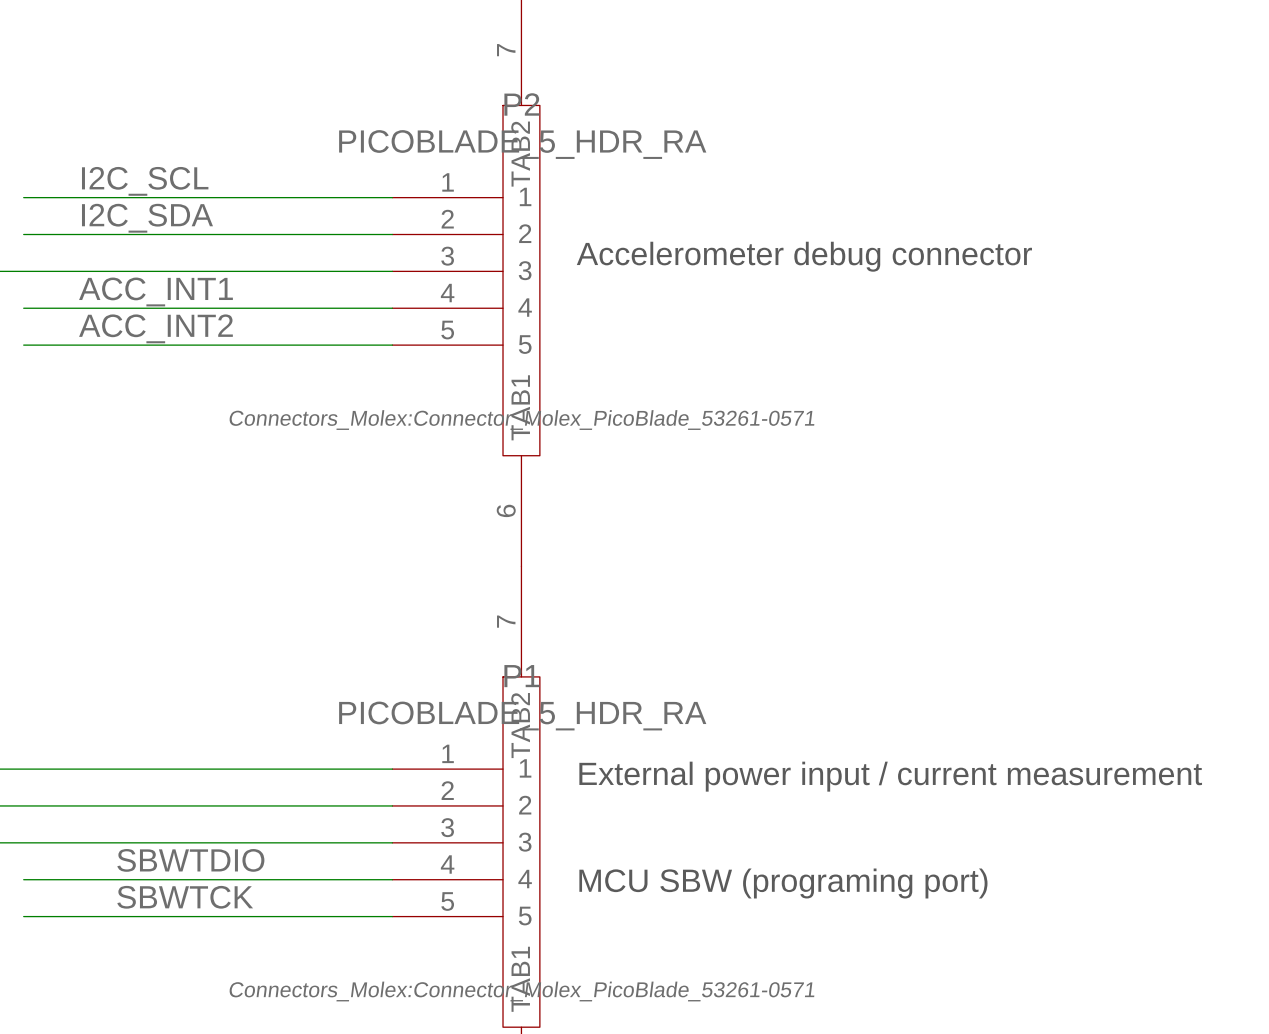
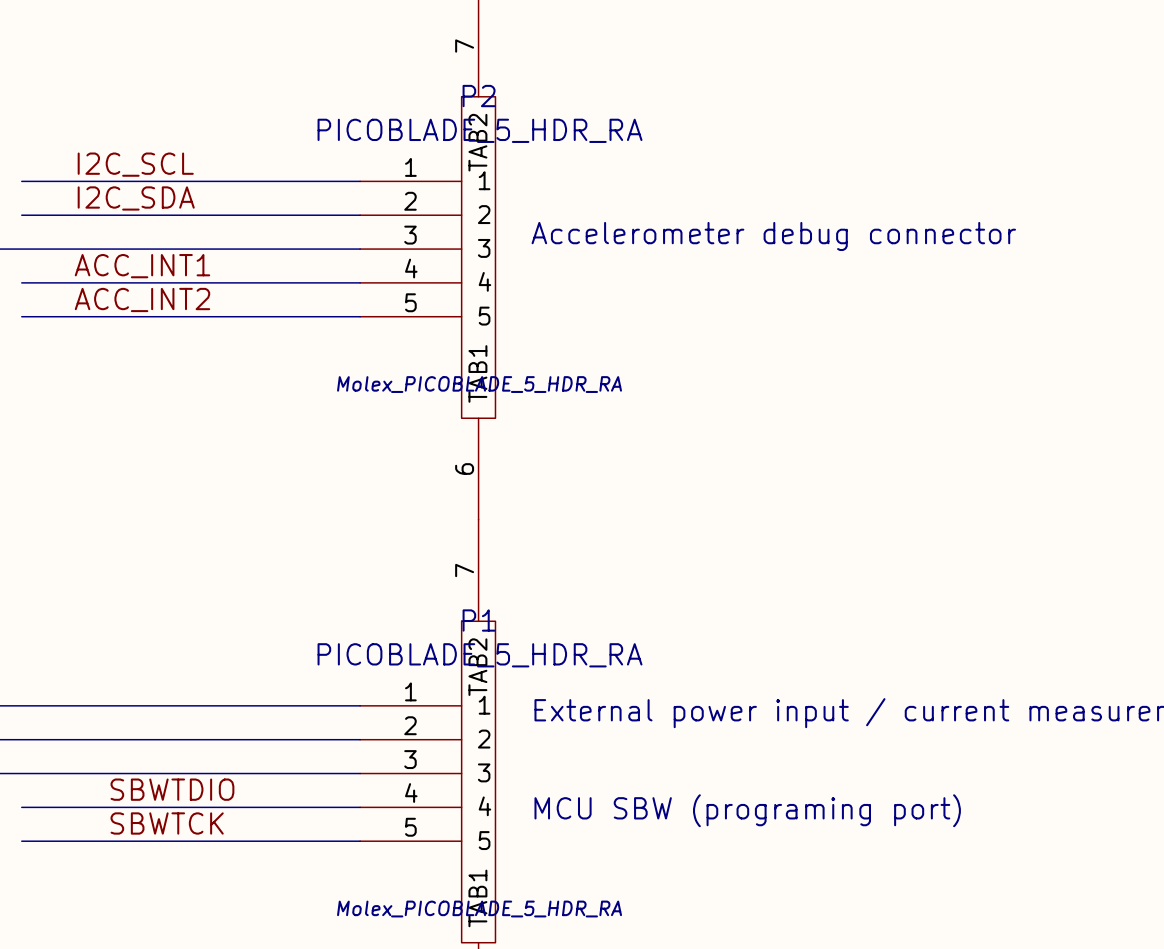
P2 text: Connectors_Molex:Connector_Molex_PicoBlade_53261-0571 (521, 420) -> Molex_PICOBLADE_5_HDR_RA (479, 384)
P1 text: Connectors_Molex:Connector_Molex_PicoBlade_53261-0571 (521, 991) -> Molex_PICOBLADE_5_HDR_RA (479, 909)

